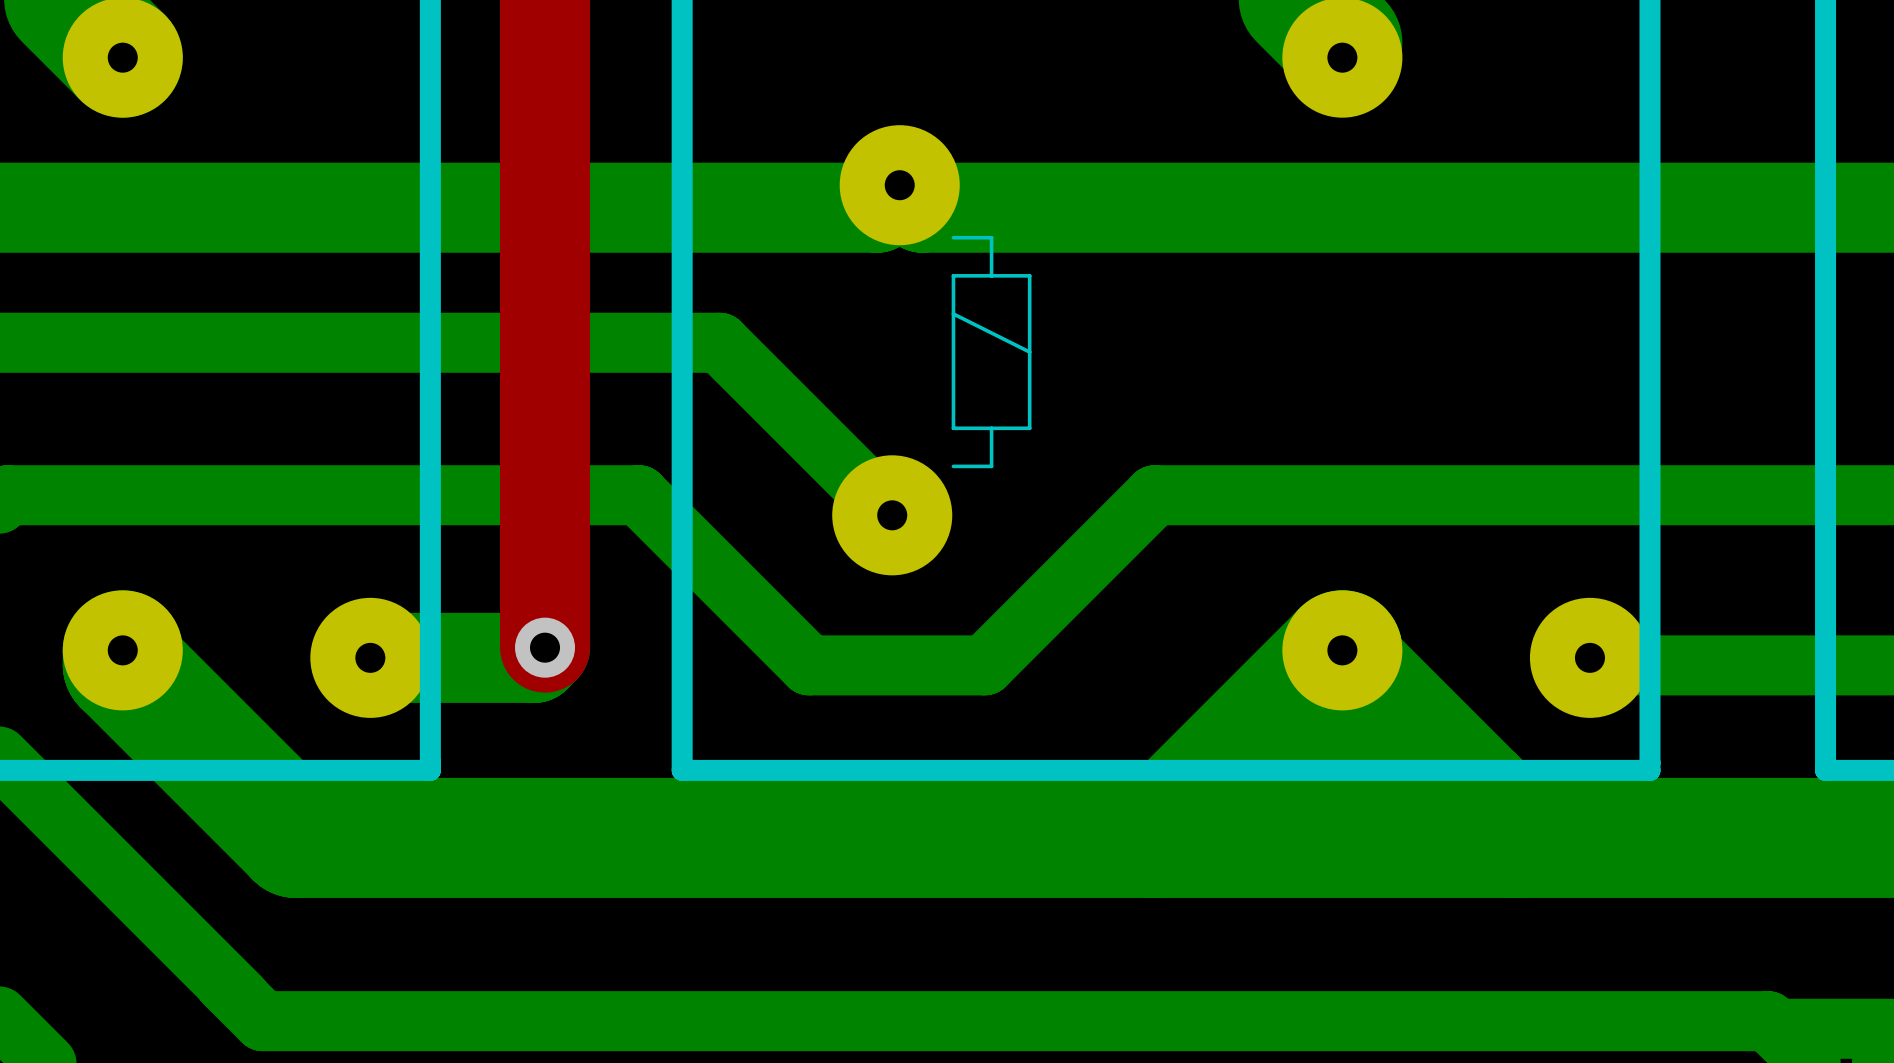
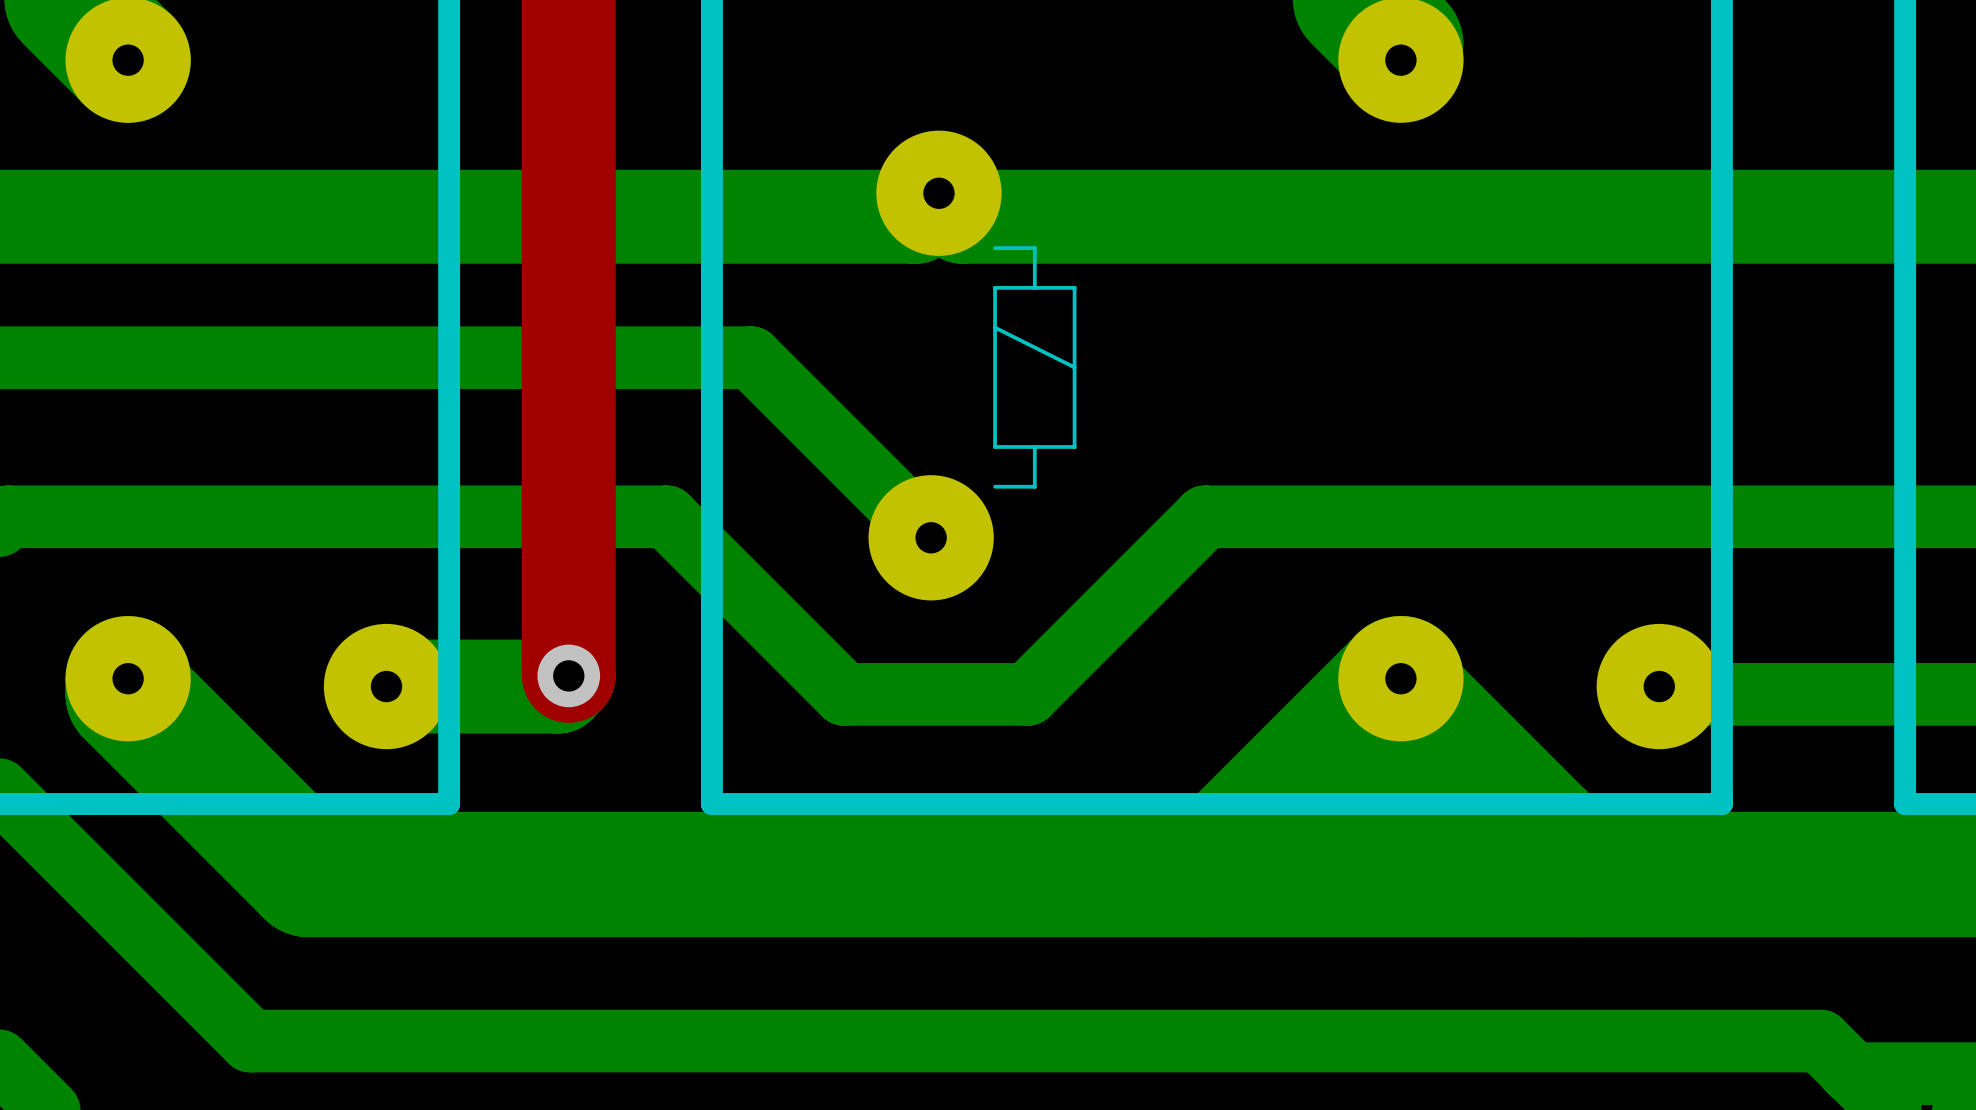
bottom track: (224, 983) (262, 1021) (1767, 1021) -> (250, 1041) (1820, 1041) (1845, 1065)

